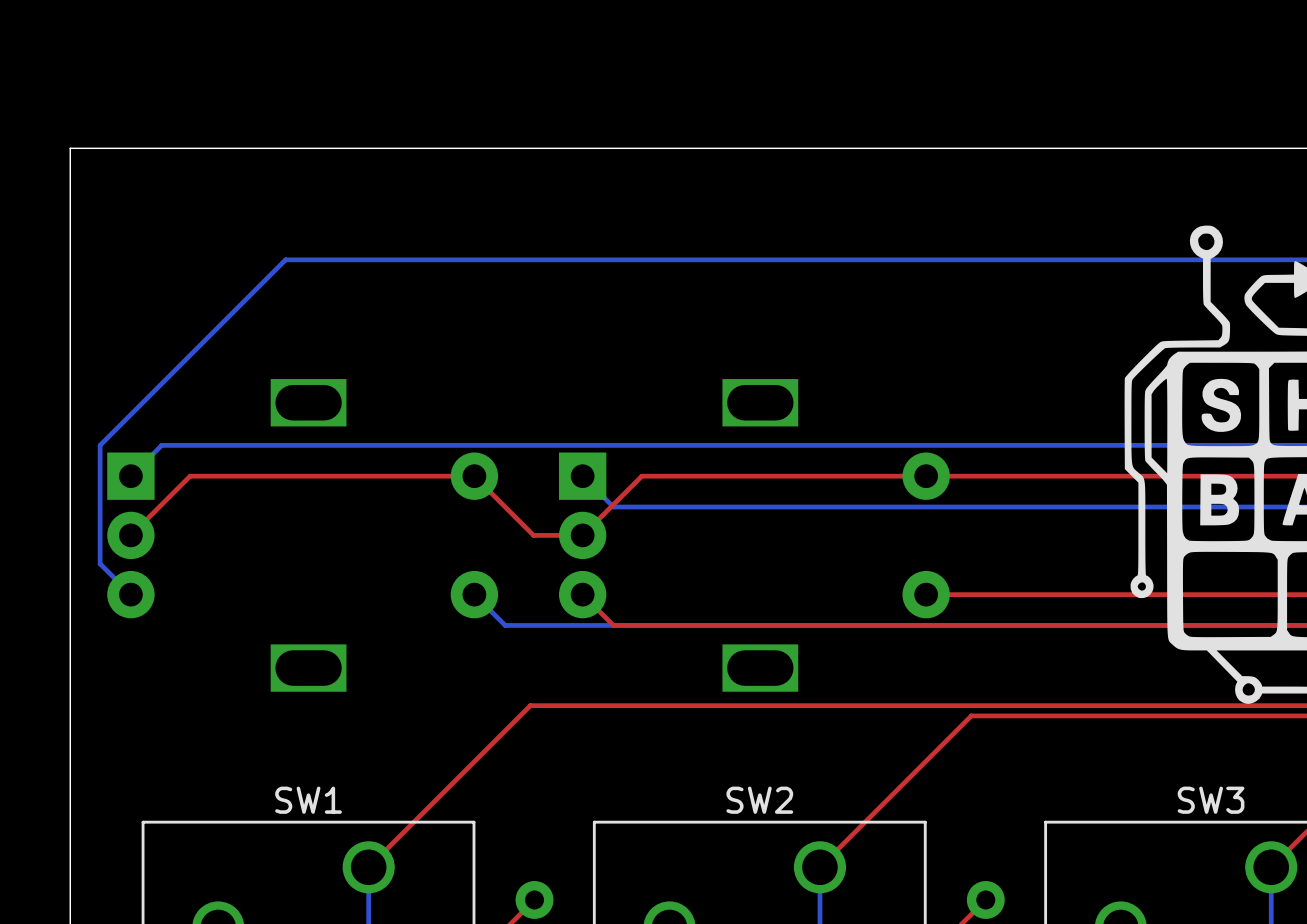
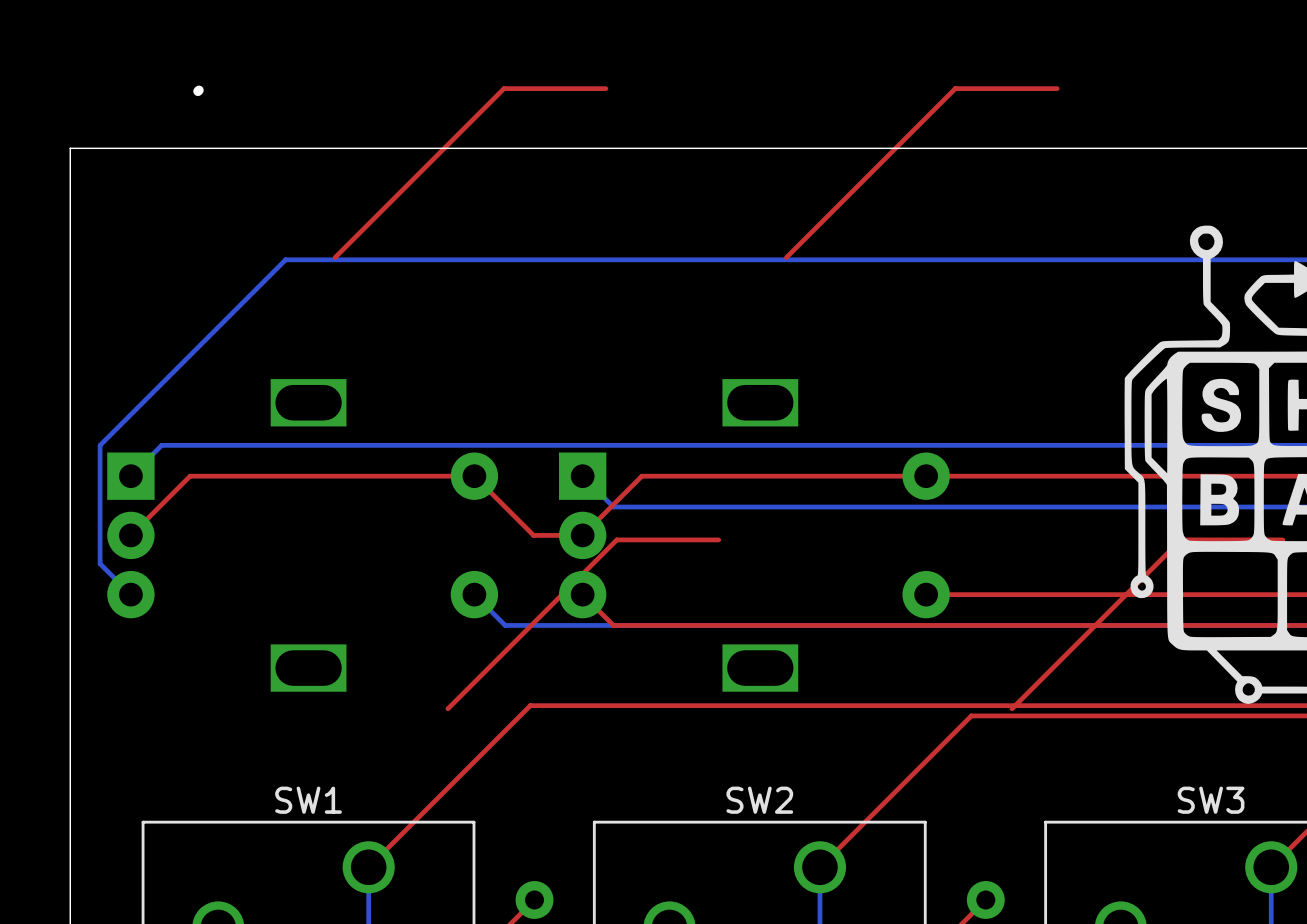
top track: none -> (605, 88) (504, 88) (335, 257)
top track: none -> (1057, 88) (955, 88) (786, 257)
board edge: none -> (199, 90) (197, 91)
top track: none -> (718, 539) (616, 539) (447, 708)
top track: none -> (1282, 539) (1180, 539) (1012, 708)

